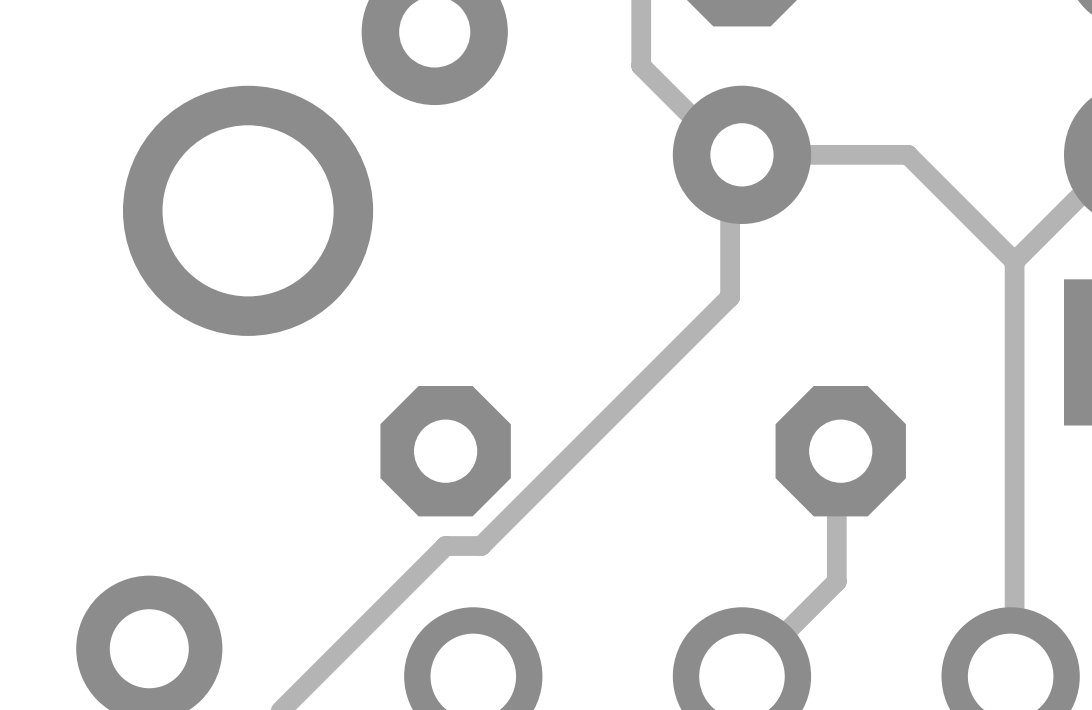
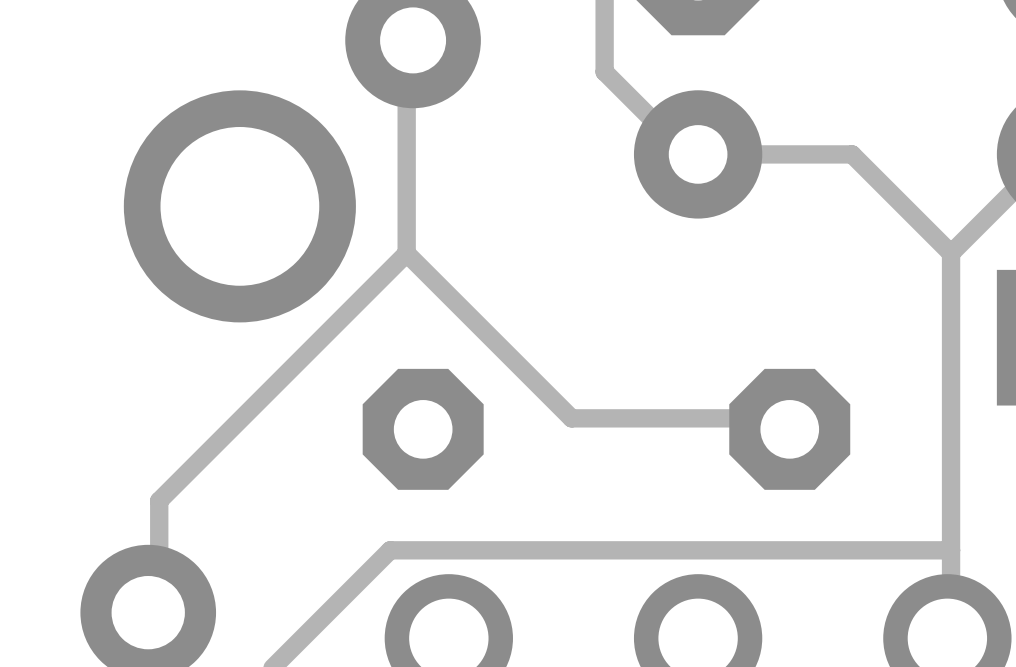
track: none -> (413, 40) (406, 55) (406, 253)
track: (730, 154) (730, 297) (481, 546) (445, 546) (410, 581) -> (951, 550) (390, 550)
track: none -> (406, 253) (159, 500) (159, 599) (148, 612)
track: (840, 451) (836, 457) (836, 581) (741, 676) -> (789, 429) (786, 418) (571, 418) (406, 253)

